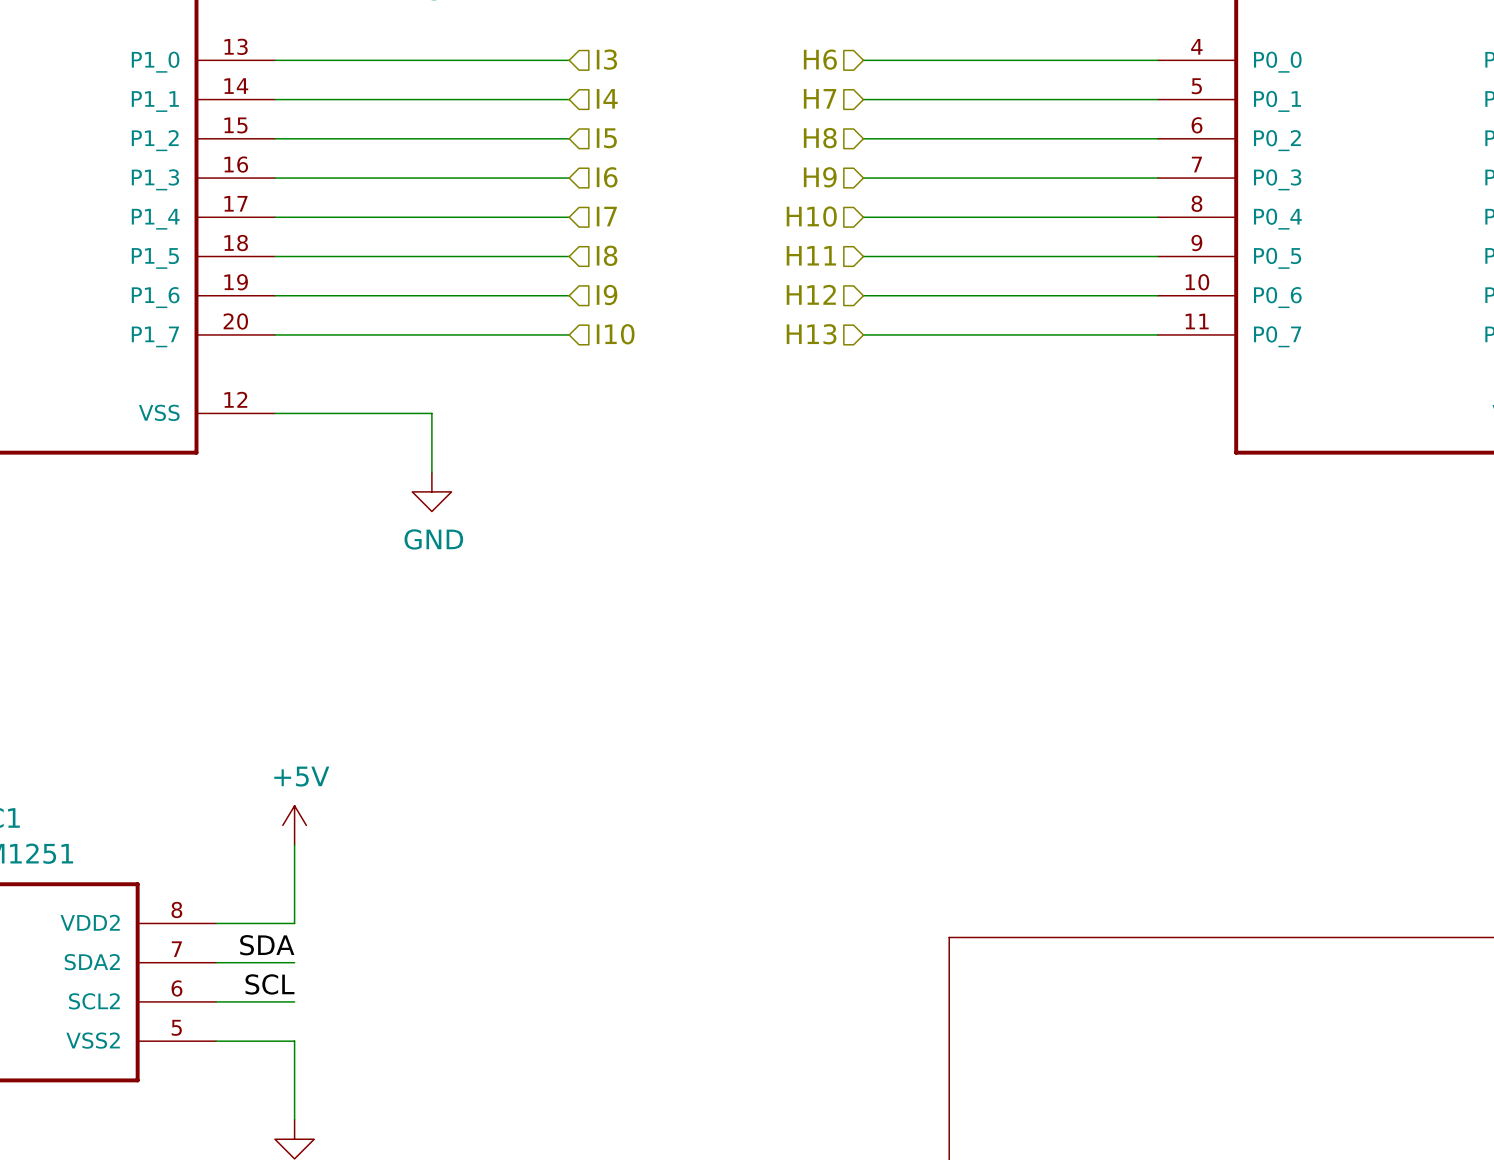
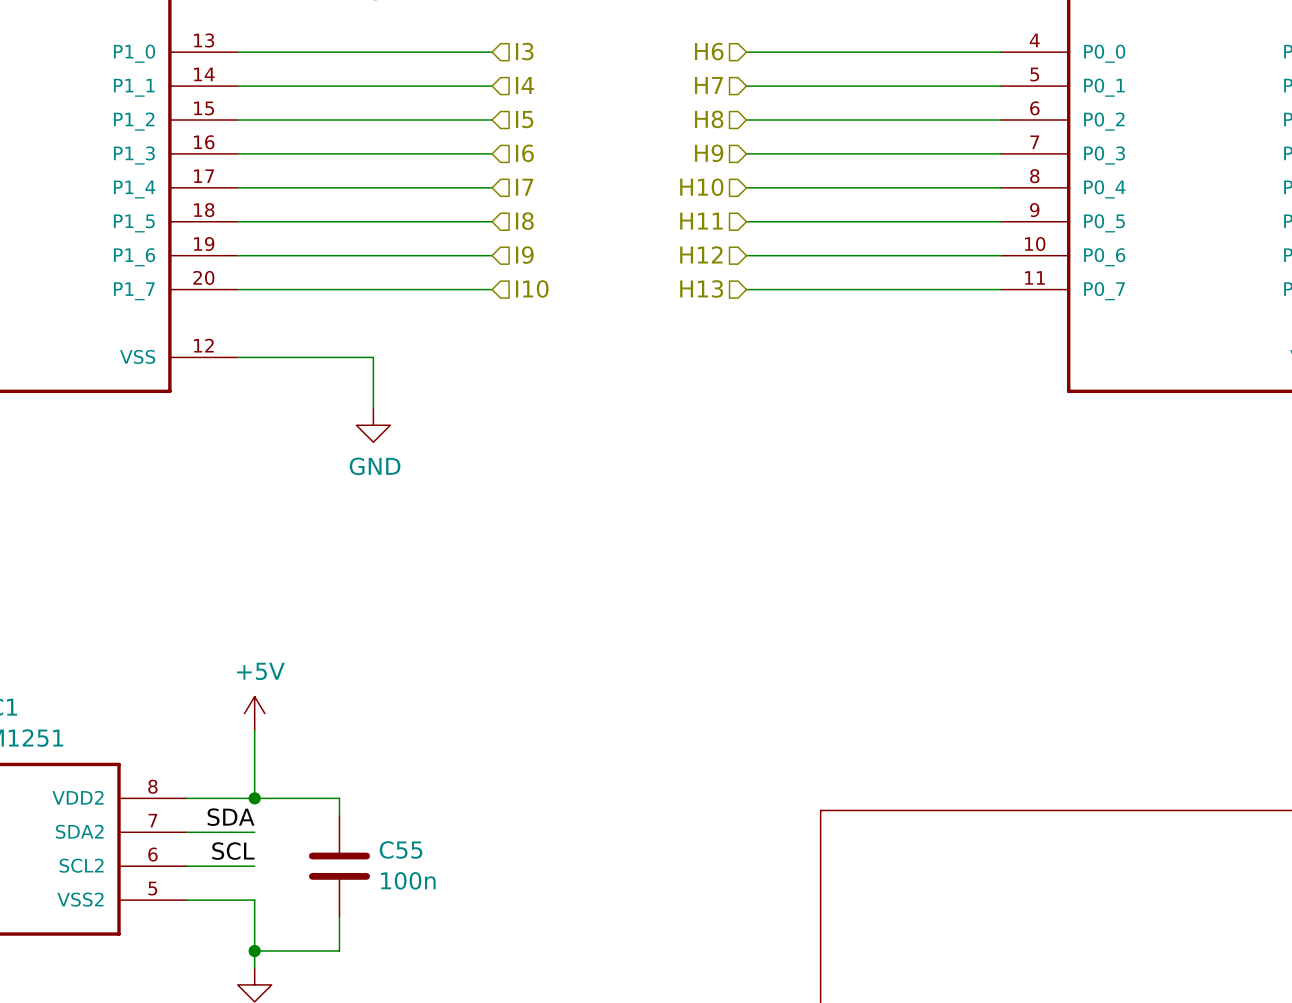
wire: none -> (254, 798) (339, 798) (339, 815)
junction: none -> (254, 798)
C55: none -> 100n (339, 866)
wire: none -> (339, 917) (339, 951) (254, 951)
junction: none -> (254, 951)

